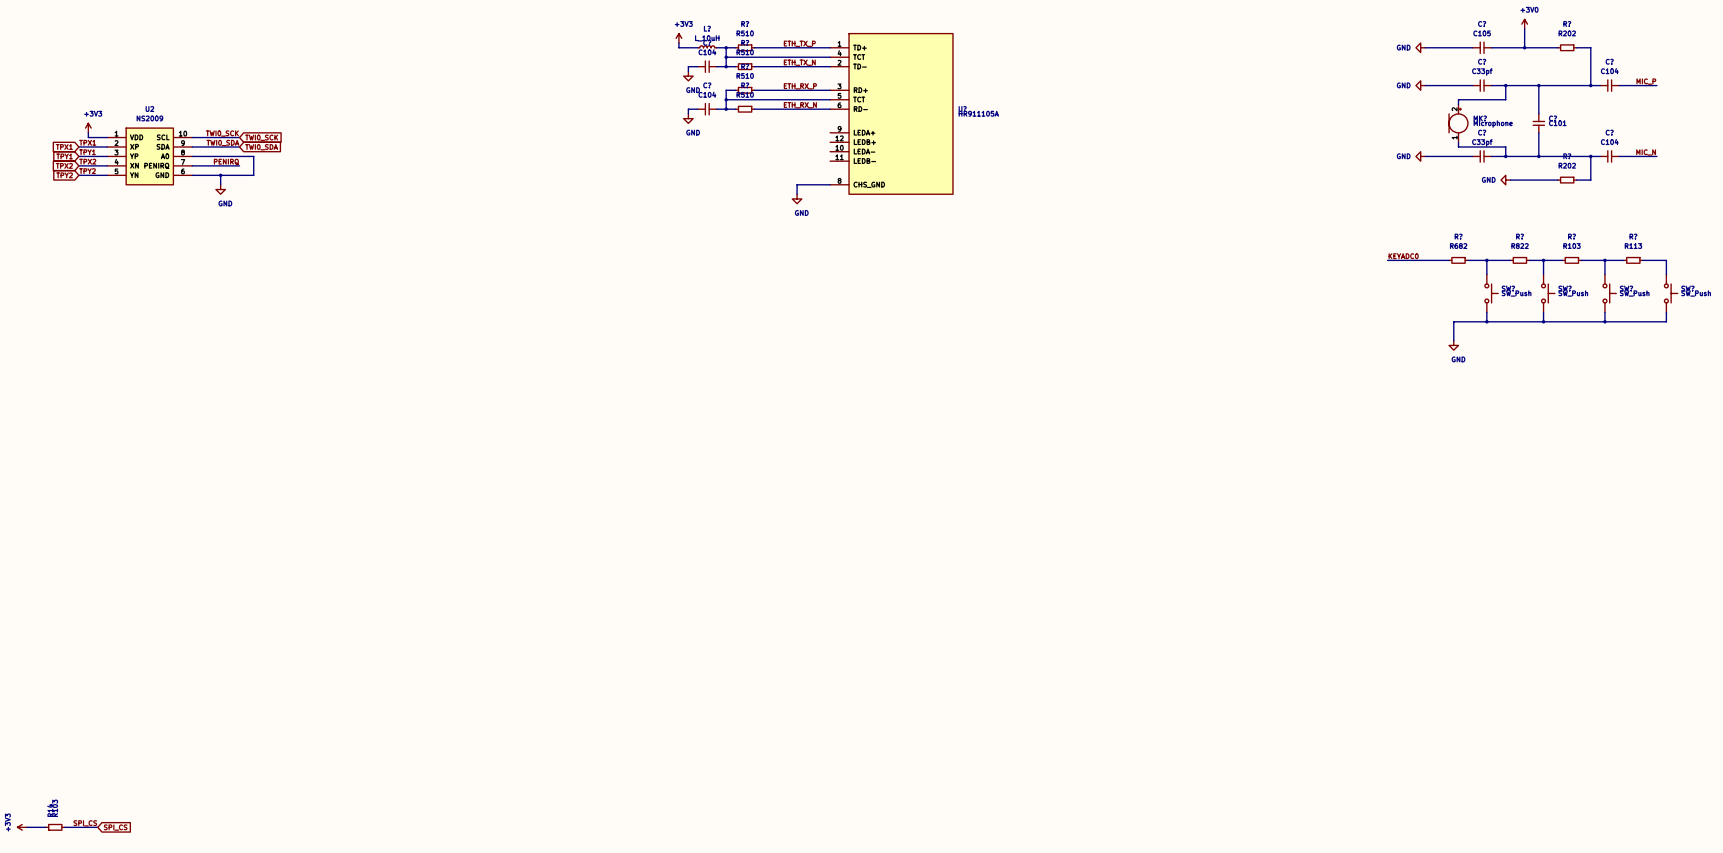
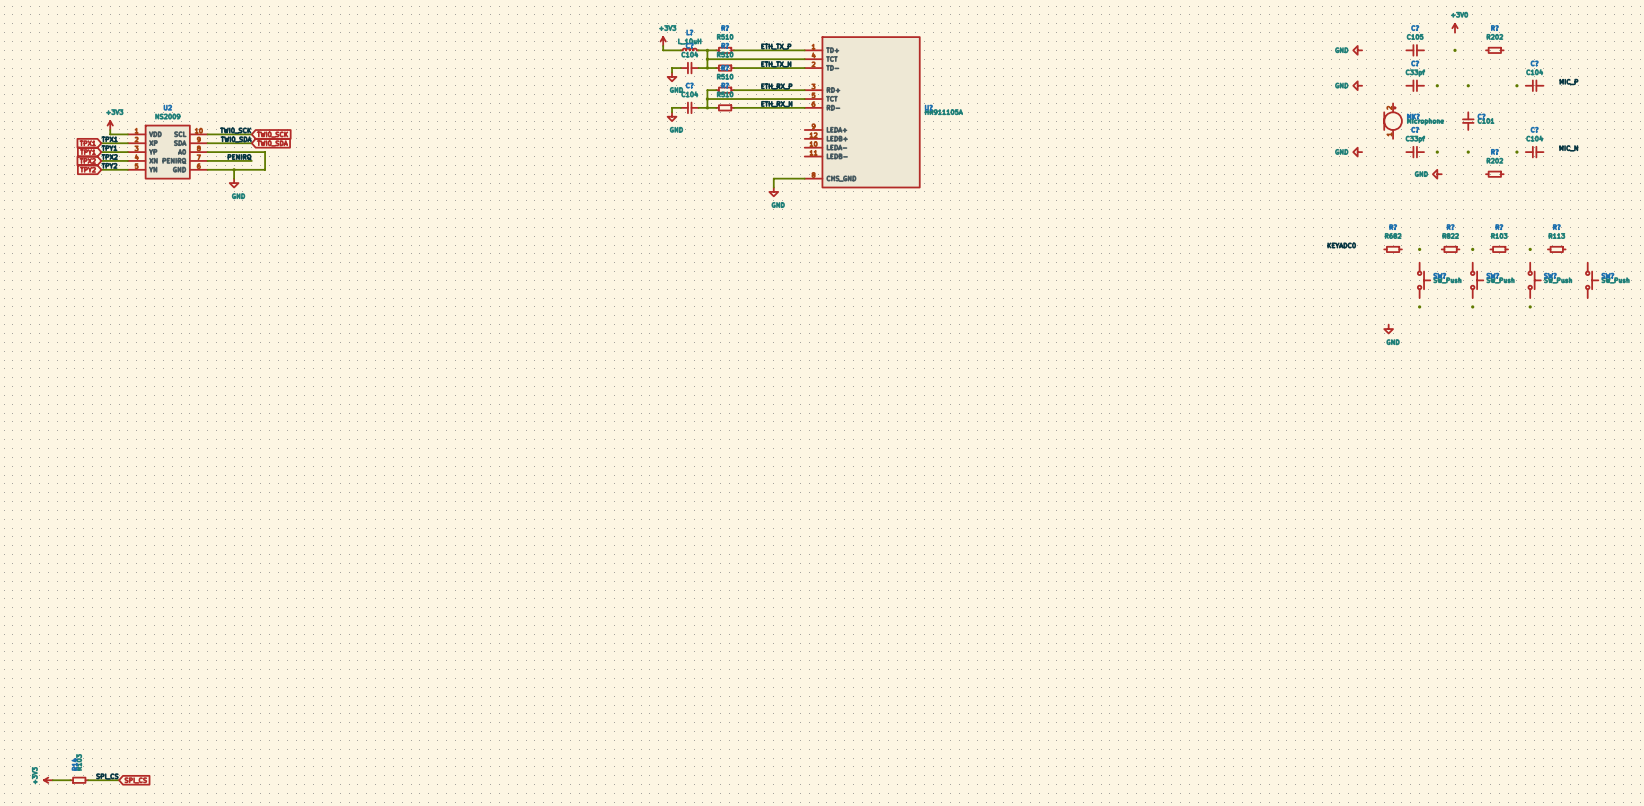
wire: (1524, 28) (1524, 47) -> none
wire: (1425, 47) (1472, 47) -> none
wire: (1491, 47) (1557, 47) -> none
wire: (1576, 47) (1590, 47) (1590, 85) -> none
wire: (1425, 85) (1472, 85) -> none
wire: (1491, 85) (1600, 85) -> none
wire: (1505, 85) (1505, 99) (1458, 99) (1458, 104) -> none
wire: (1538, 85) (1538, 113) -> none
wire: (1619, 85) (1656, 85) -> none
wire: (1538, 132) (1538, 156) -> none
wire: (1458, 142) (1458, 146) (1505, 146) (1505, 156) -> none
wire: (1425, 156) (1472, 156) -> none
wire: (1491, 156) (1600, 156) -> none
wire: (1590, 156) (1590, 180) (1576, 180) -> none
wire: (1619, 156) (1656, 156) -> none
wire: (1510, 180) (1557, 180) -> none
wire: (1387, 260) (1449, 260) -> none
wire: (1467, 260) (1510, 260) -> none
wire: (1486, 260) (1486, 274) -> none
wire: (1529, 260) (1562, 260) -> none
wire: (1543, 260) (1543, 274) -> none
wire: (1581, 260) (1623, 260) -> none
wire: (1604, 260) (1604, 274) -> none
wire: (1642, 260) (1666, 260) (1666, 274) -> none
wire: (1486, 312) (1486, 321) -> none
wire: (1543, 312) (1543, 321) -> none
wire: (1604, 312) (1604, 321) -> none
wire: (1666, 312) (1666, 321) (1453, 321) (1453, 340) -> none

